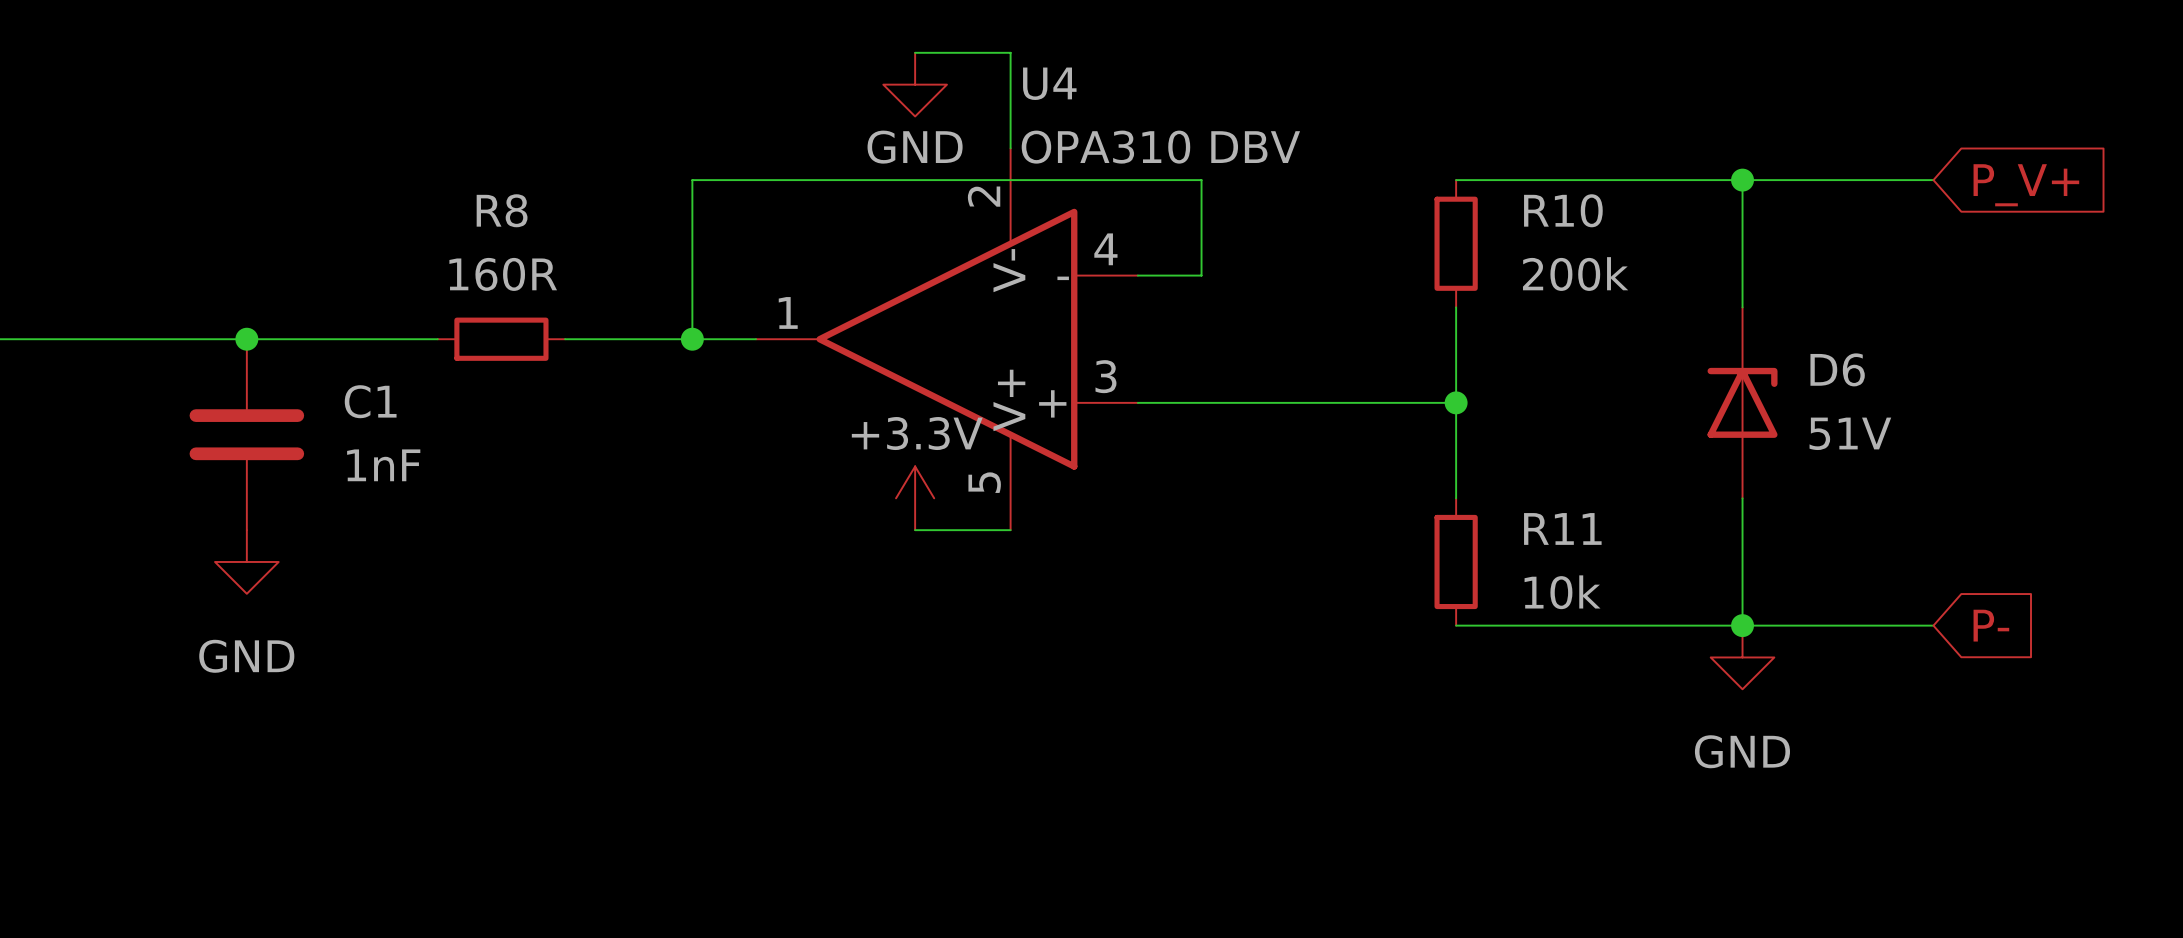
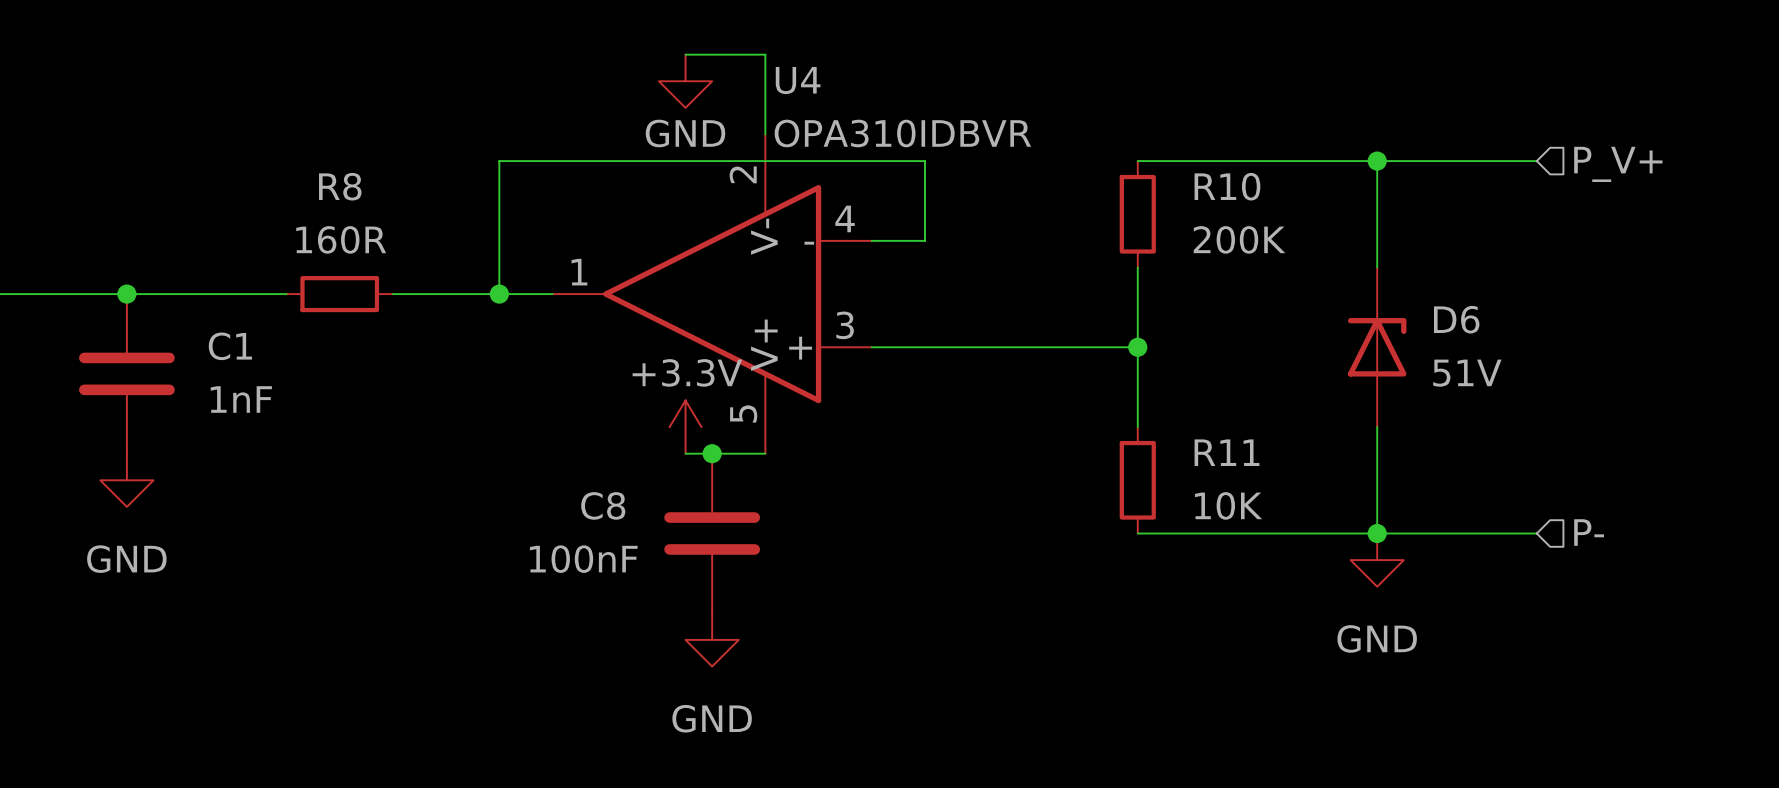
U4 value: OPA310 DBV (1160, 147) -> OPA310IDBVR (902, 133)
hierarchical label: none -> P_V+ (1618, 164)
global label: P_V+ (2026, 185) -> none
R10 value: 200k (1575, 274) -> 200K (1239, 239)
junction: none -> (712, 453)
R11 value: 10k (1562, 592) -> 10K (1228, 505)
hierarchical label: none -> P- (1589, 532)
C8: none -> 100nF (712, 533)
global label: P- (1991, 625) -> none
power symbol: none -> GND (712, 639)

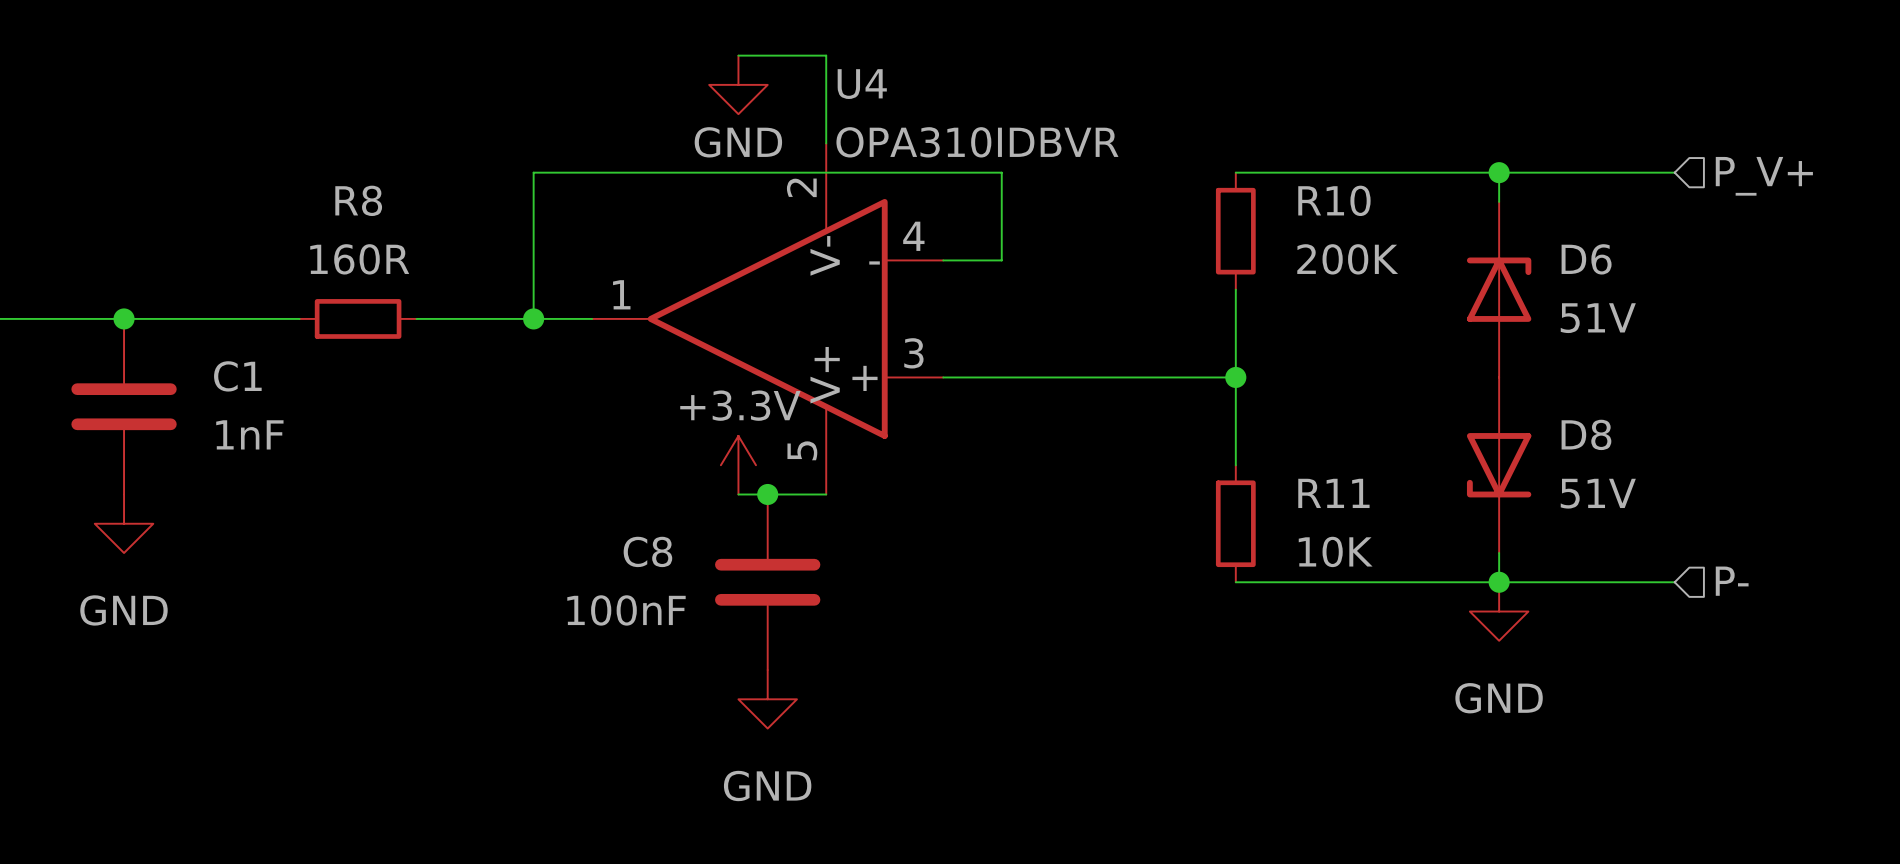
D6 position: (1377, 347) -> (1499, 289)
D8: none -> 51V (1499, 465)

